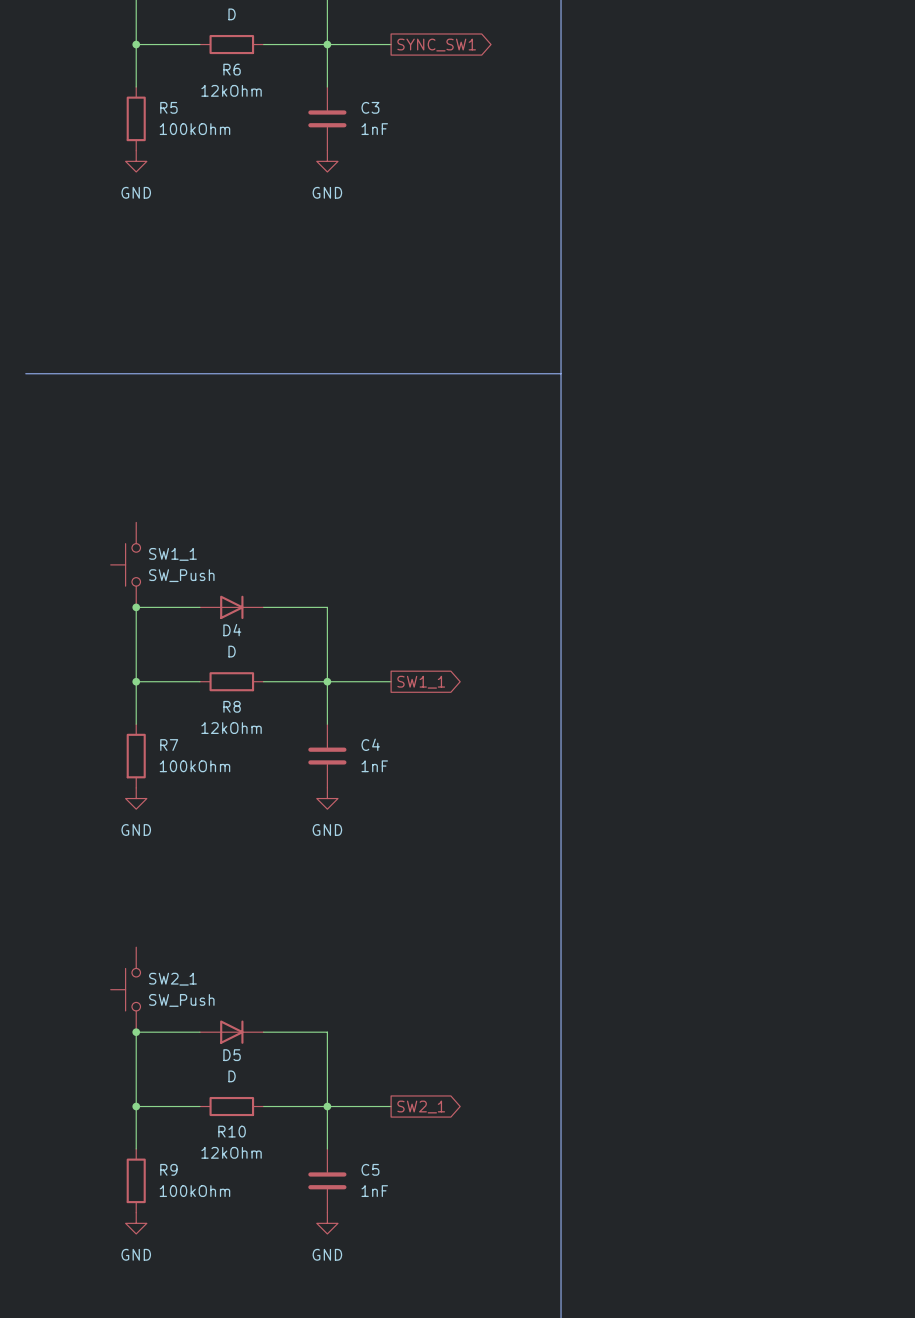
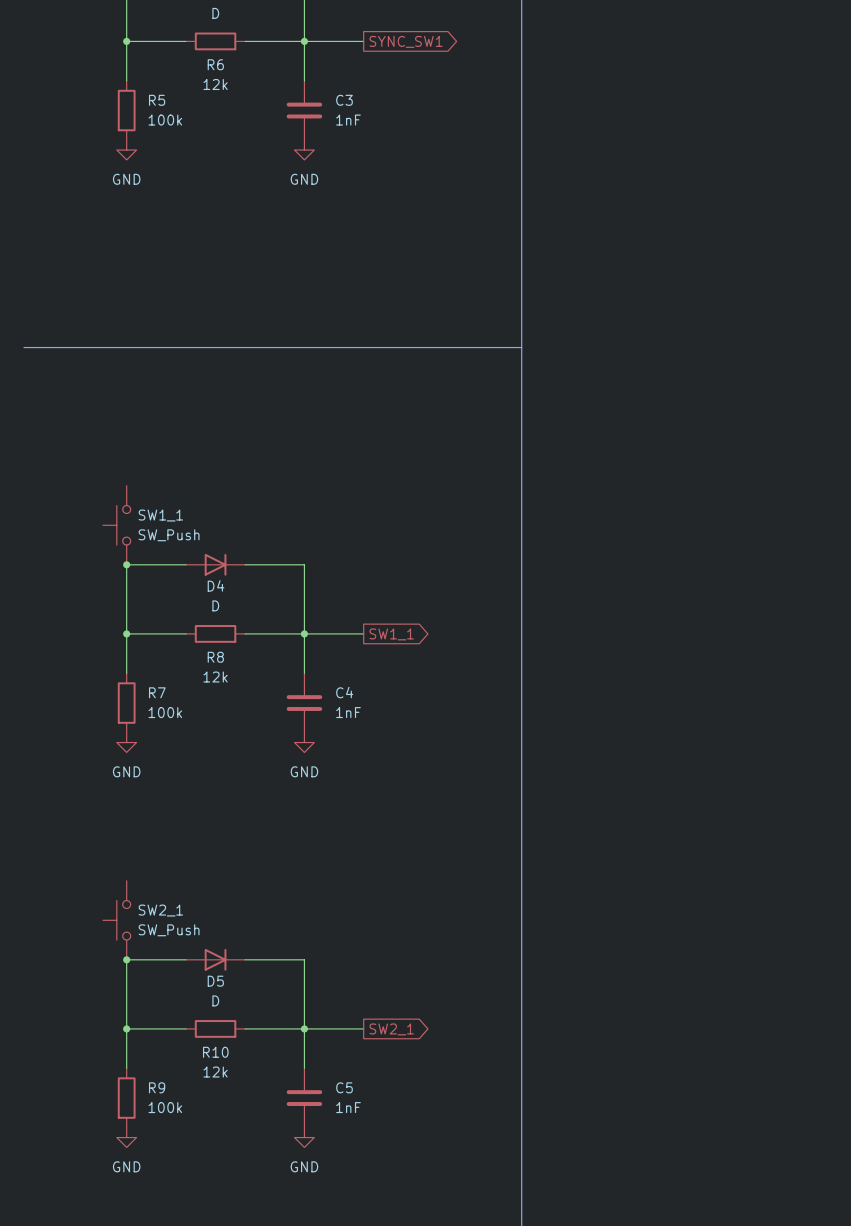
R6 value: 12kOhm (231, 90) -> 12k (215, 84)
R5 value: 100kOhm (194, 129) -> 100k (165, 120)
R8 value: 12kOhm (231, 728) -> 12k (215, 677)
R7 value: 100kOhm (194, 766) -> 100k (165, 712)
R10 value: 12kOhm (231, 1152) -> 12k (215, 1072)
R9 value: 100kOhm (194, 1191) -> 100k (165, 1107)

